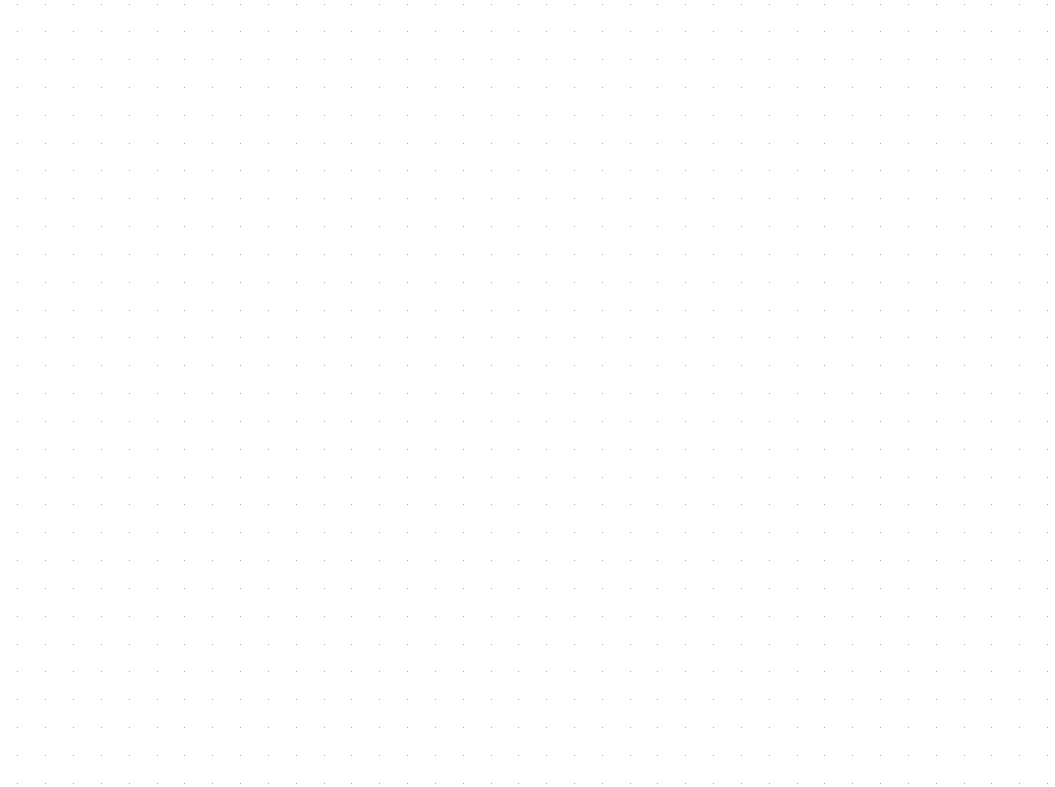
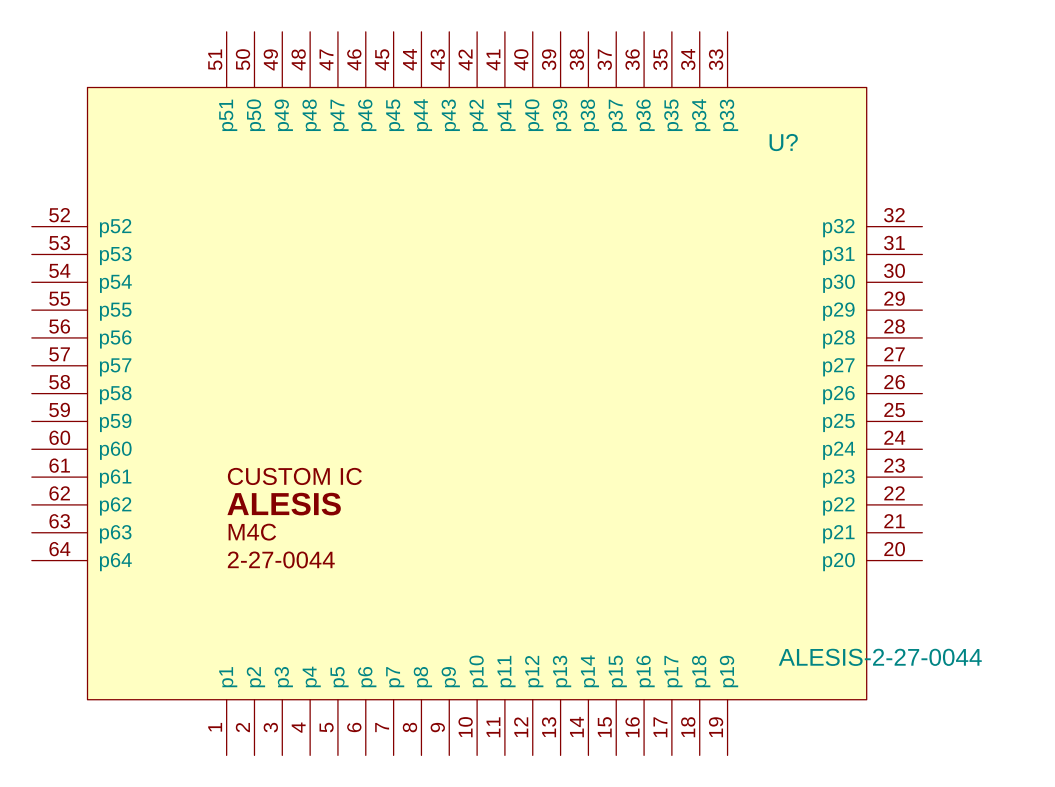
U?: none -> ALESIS-2-27-0044 (477, 393)

